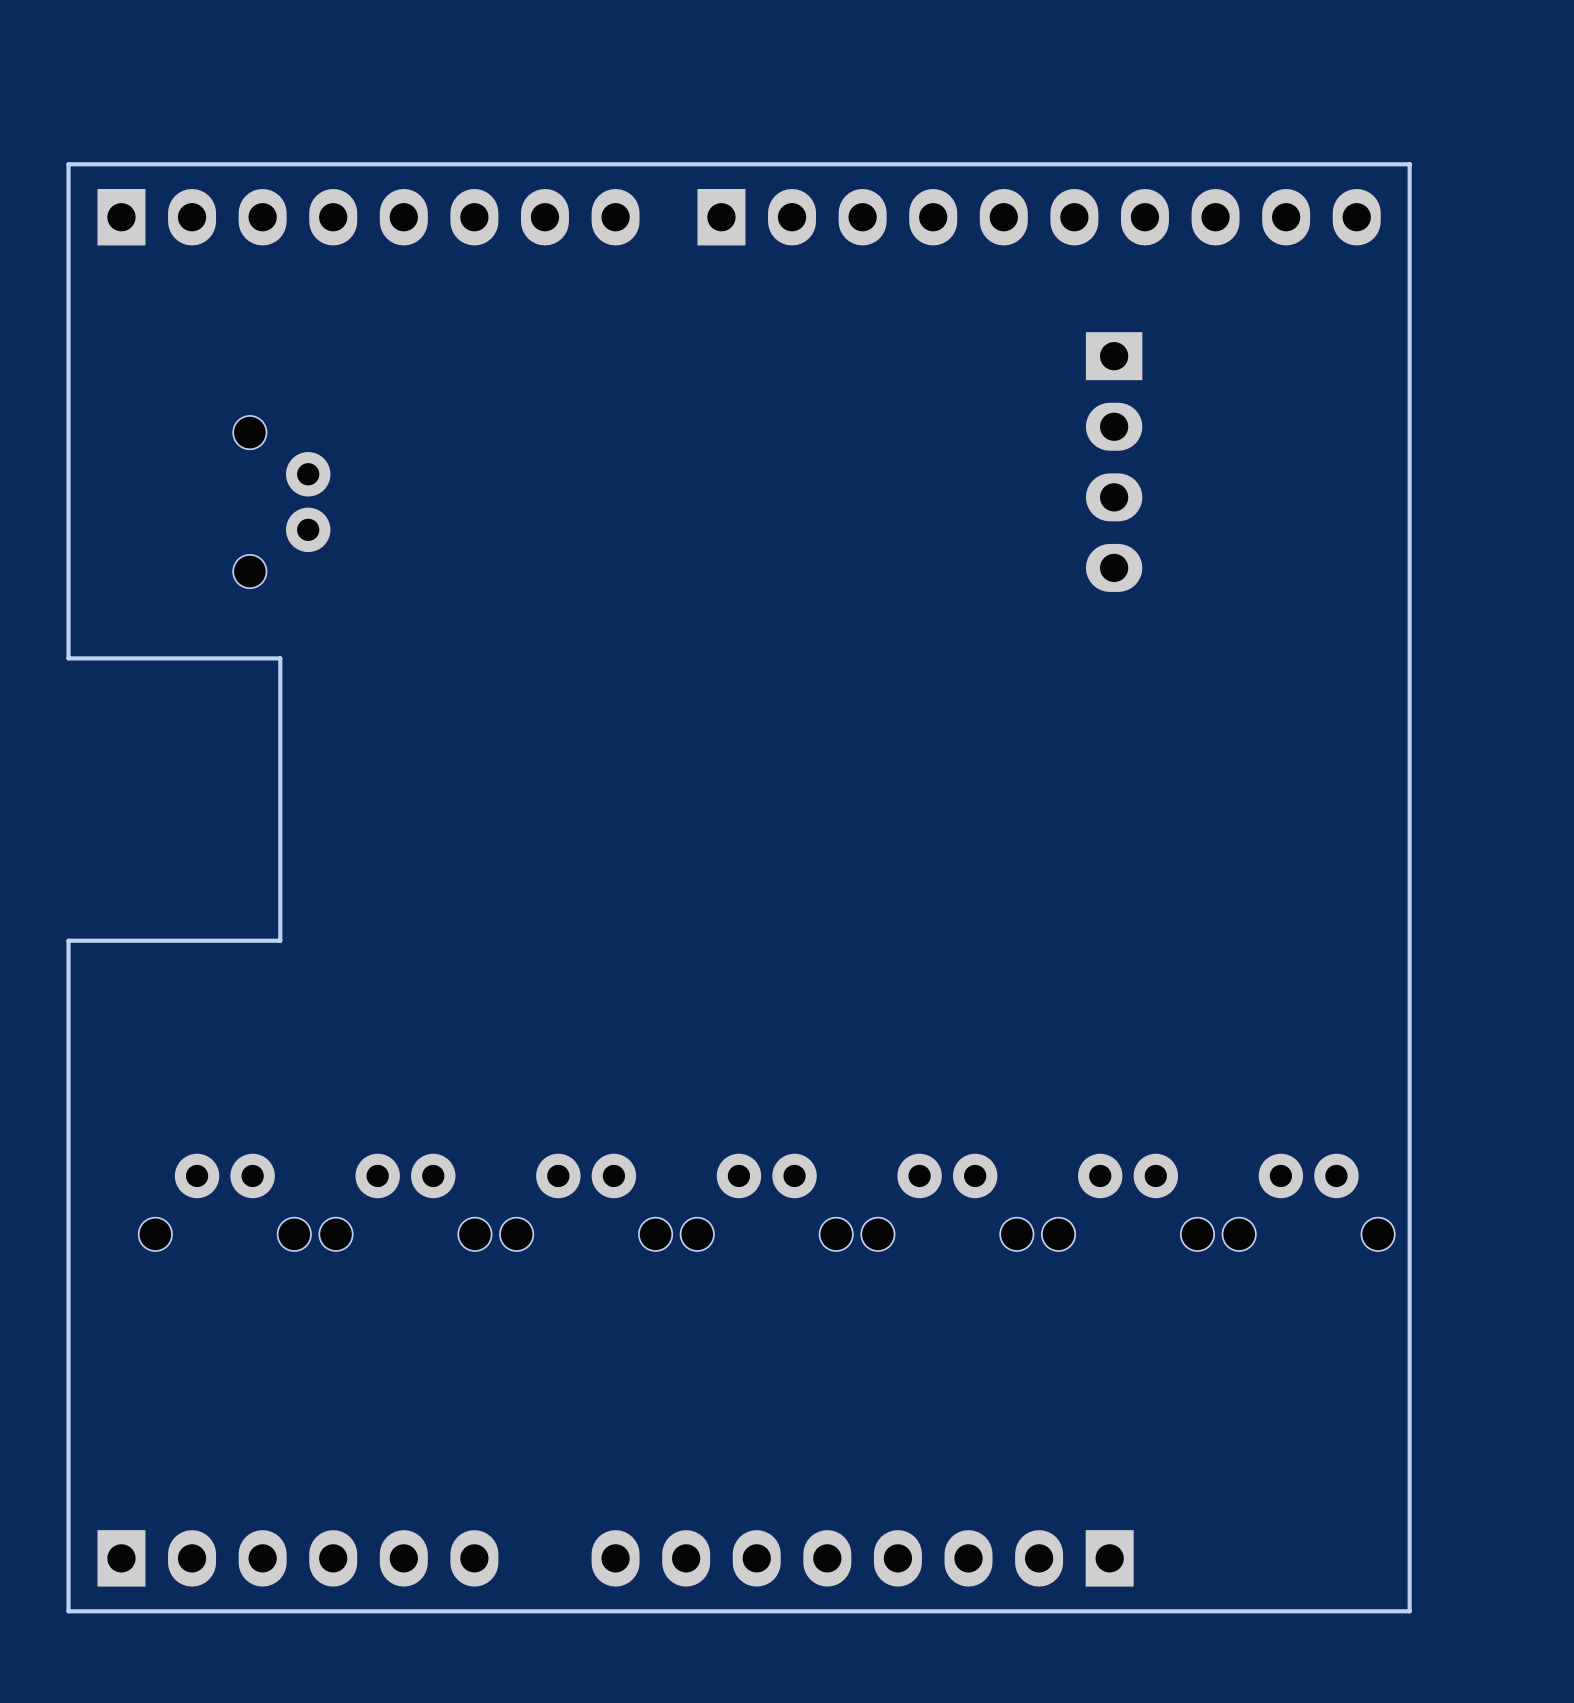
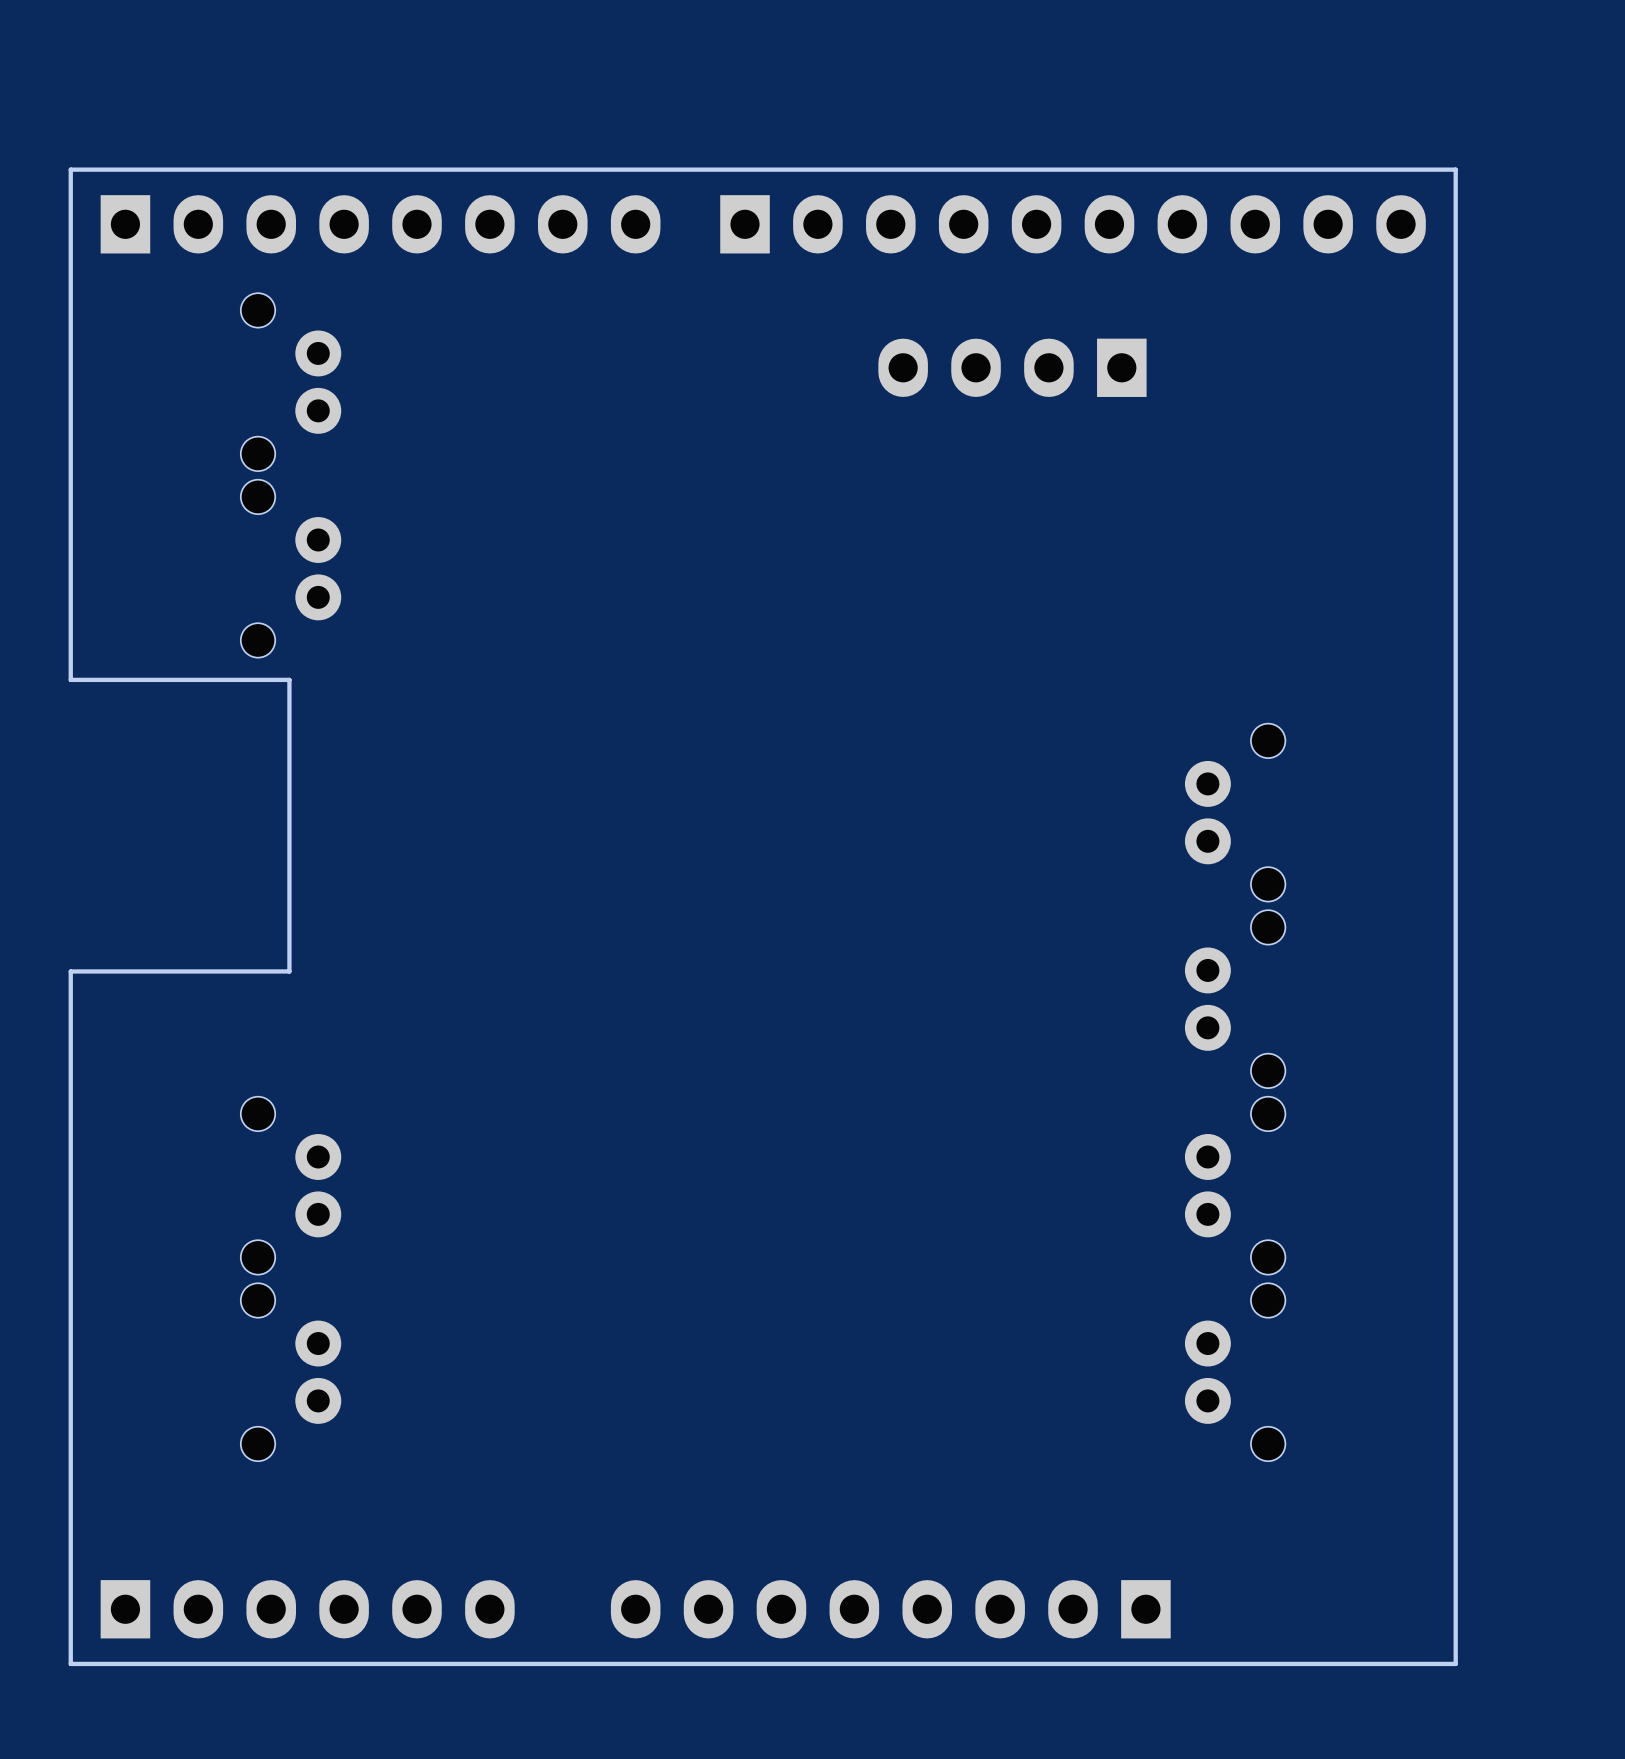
part: none -> (291, 382)
part rotation: 0° (1114, 462) -> 90° clockwise (1012, 367)
part position: (1114, 462) -> (1012, 367)
part position: (281, 502) -> (291, 568)
part: none -> (1235, 812)
part: none -> (1235, 999)
part: none -> (291, 1185)
part: none -> (1235, 1185)
part: (224, 1202) -> none
part: (405, 1202) -> none
part: (586, 1202) -> none
part: (766, 1202) -> none
part: (947, 1202) -> none
part: (1128, 1202) -> none
part: (1308, 1202) -> none
part: none -> (291, 1372)
part: none -> (1235, 1372)

